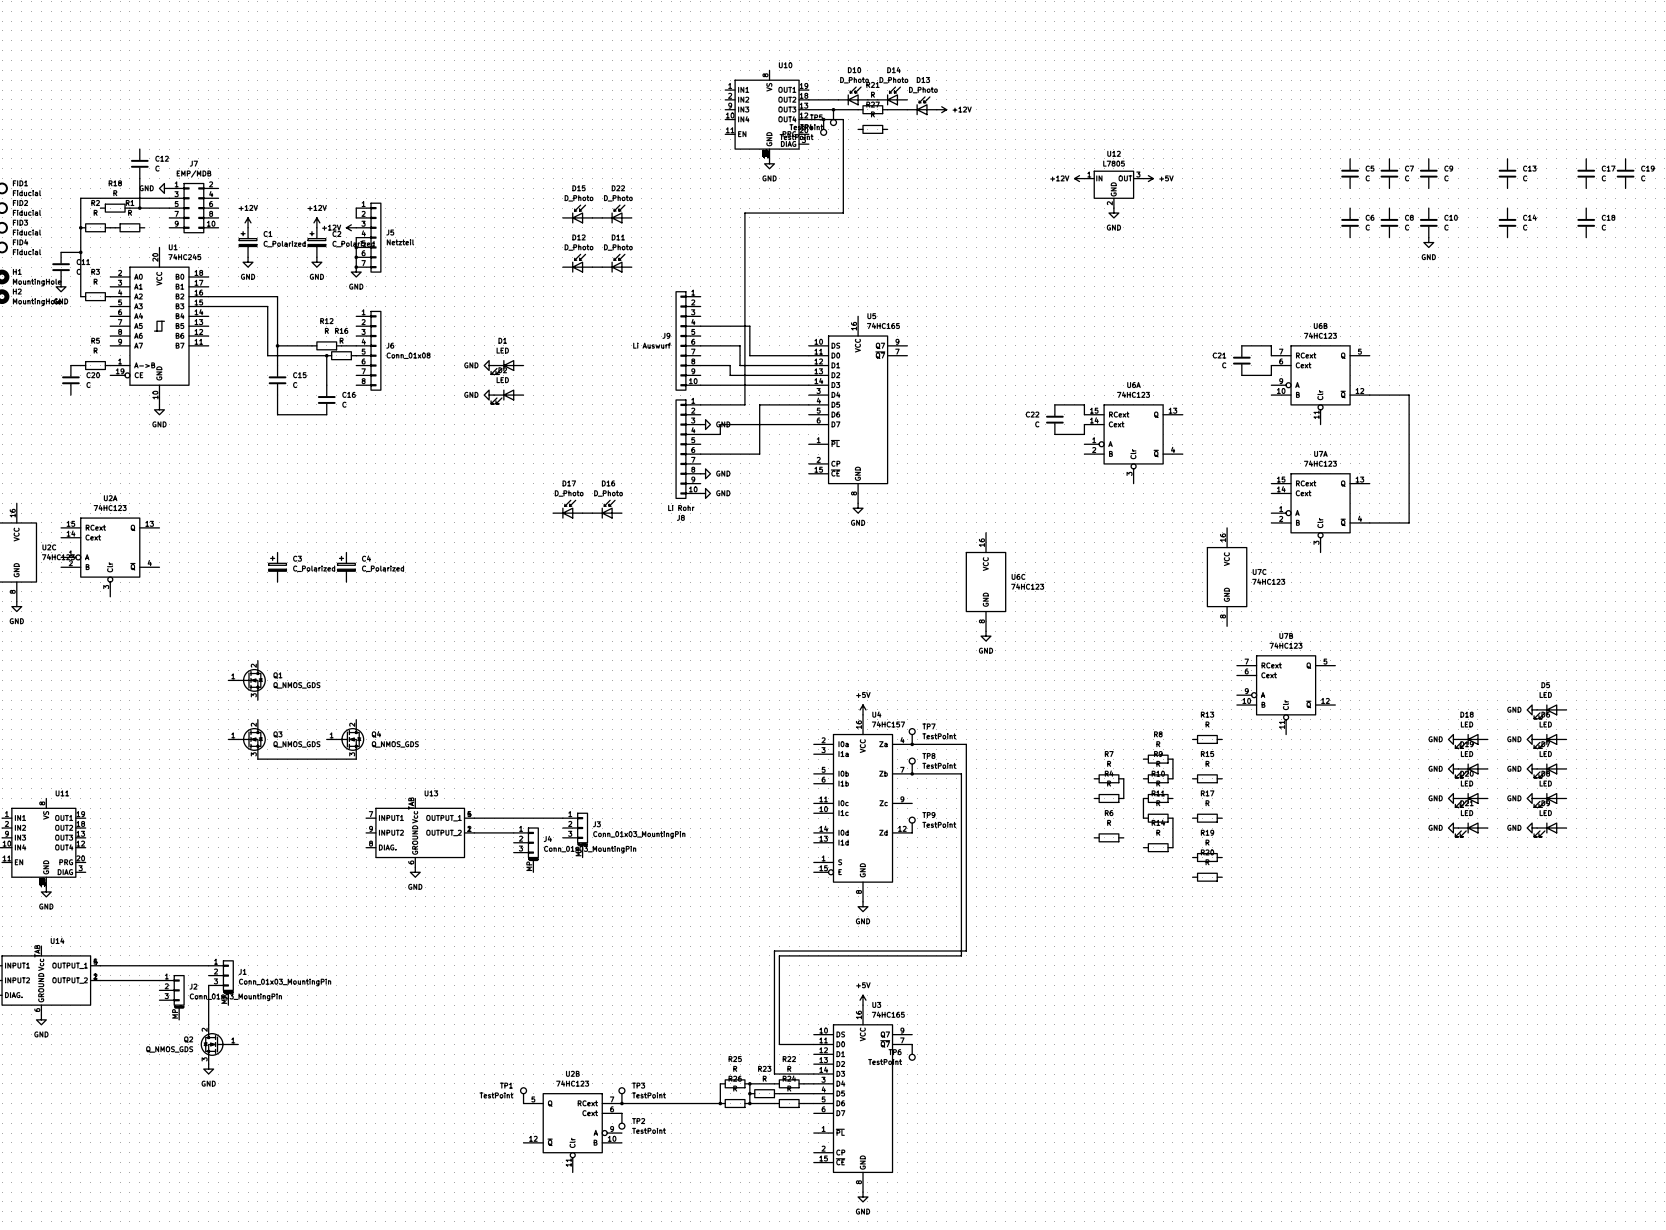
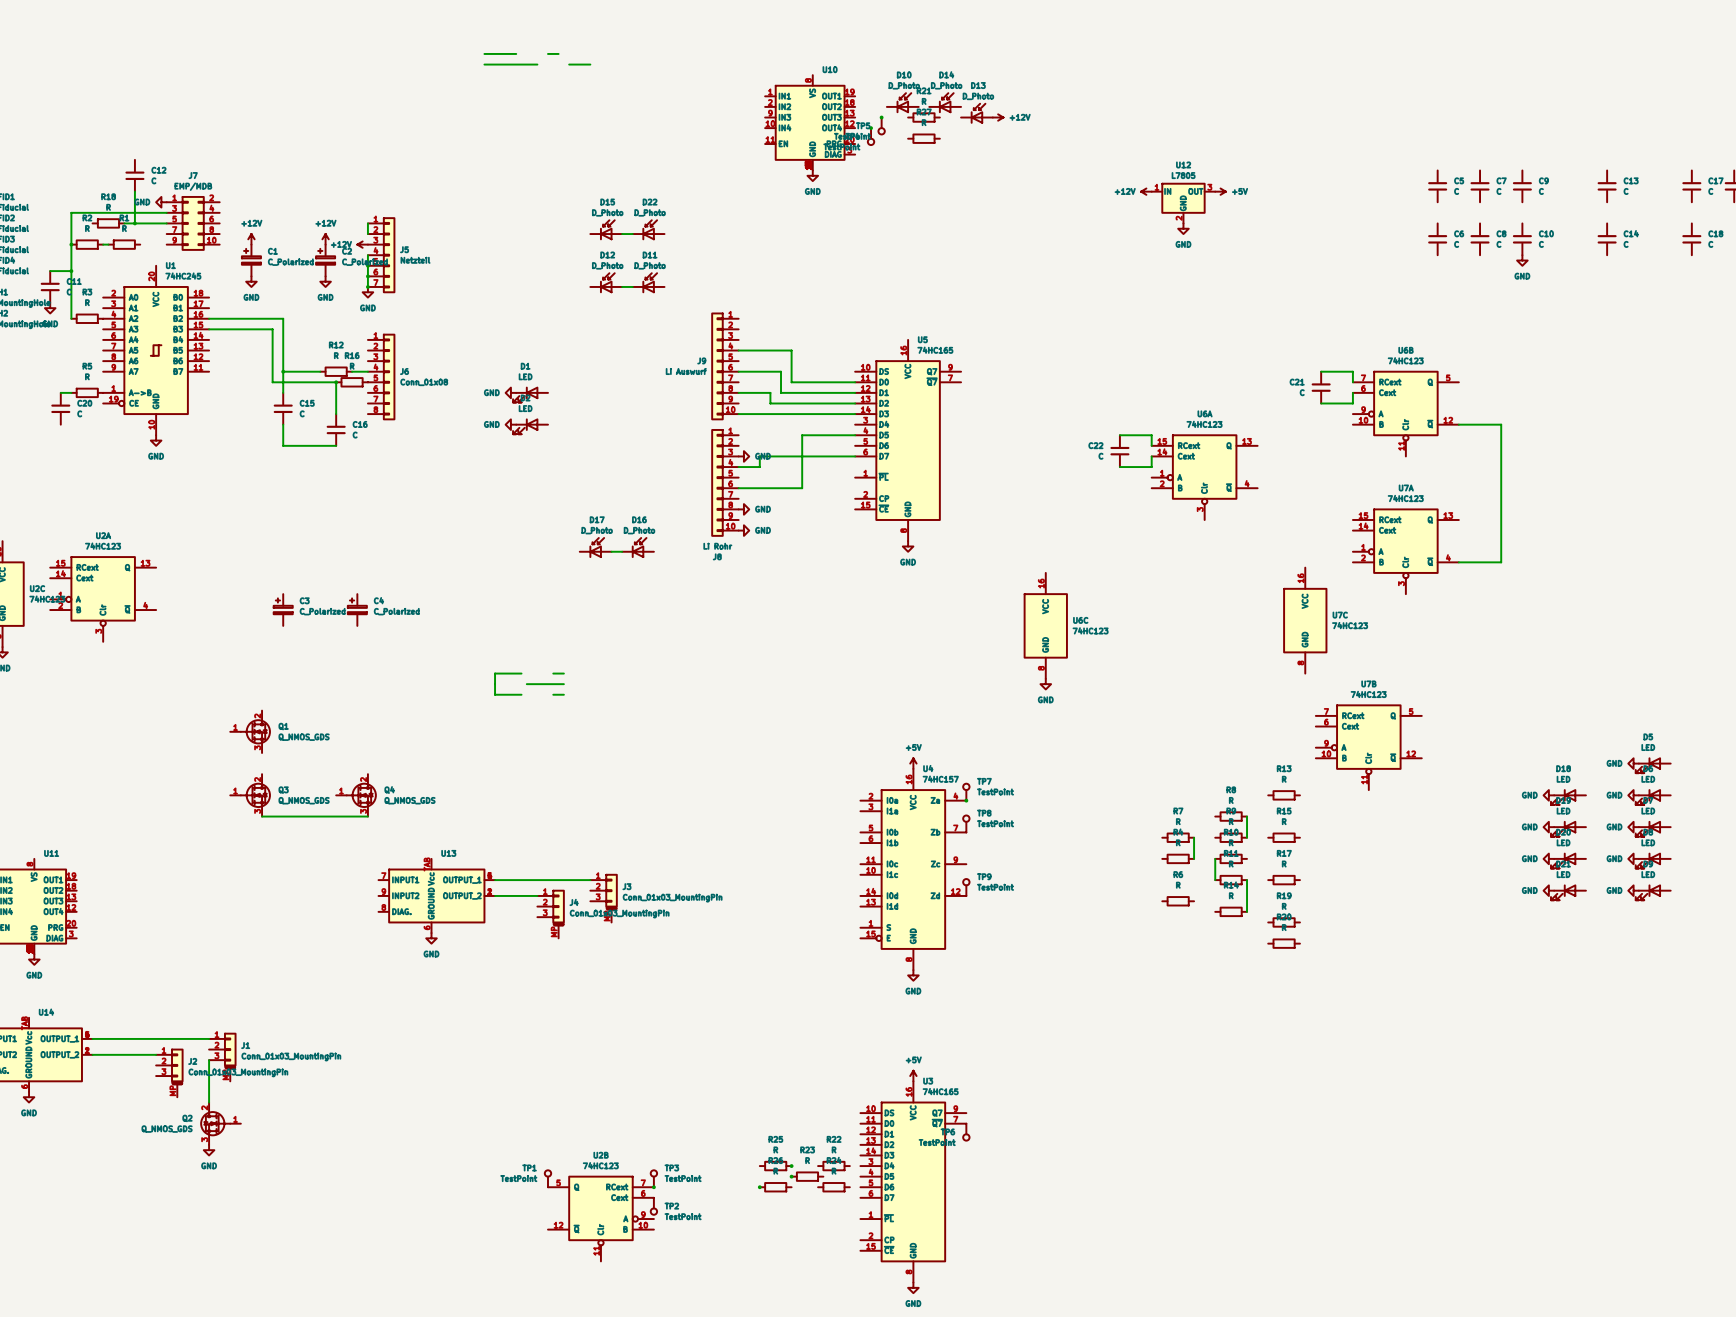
wire: none -> (484, 53) (516, 53)
wire: none -> (547, 53) (558, 53)
wire: none -> (484, 64) (537, 64)
wire: none -> (569, 64) (590, 64)
wire: (808, 99) (838, 99) -> none
wire: (867, 99) (877, 99) -> none
wire: (808, 109) (858, 109) -> none
wire: (887, 109) (907, 109) -> none
wire: (808, 119) (843, 119) (843, 213) (744, 213) (744, 404) (700, 404) -> none
wire: none -> (521, 673) (495, 673) (495, 694) (521, 694)
wire: none -> (553, 673) (563, 673)
wire: none -> (526, 684) (563, 684)
wire: none -> (553, 694) (563, 694)
wire: (912, 744) (966, 744) (966, 951) (774, 951) (774, 1074) (813, 1074) -> none
wire: (912, 773) (961, 773) (961, 955) (779, 955) (779, 1044) (813, 1044) -> none
junction: (912, 773) -> none
wire: (720, 1083) (720, 1103) (621, 1103) -> none
wire: (774, 1083) (749, 1083) (749, 1103) (774, 1103) -> none
wire: (803, 1083) (813, 1083) -> none
wire: (779, 1093) (813, 1093) -> none
junction: (749, 1103) -> none
wire: (803, 1103) (813, 1103) -> none

